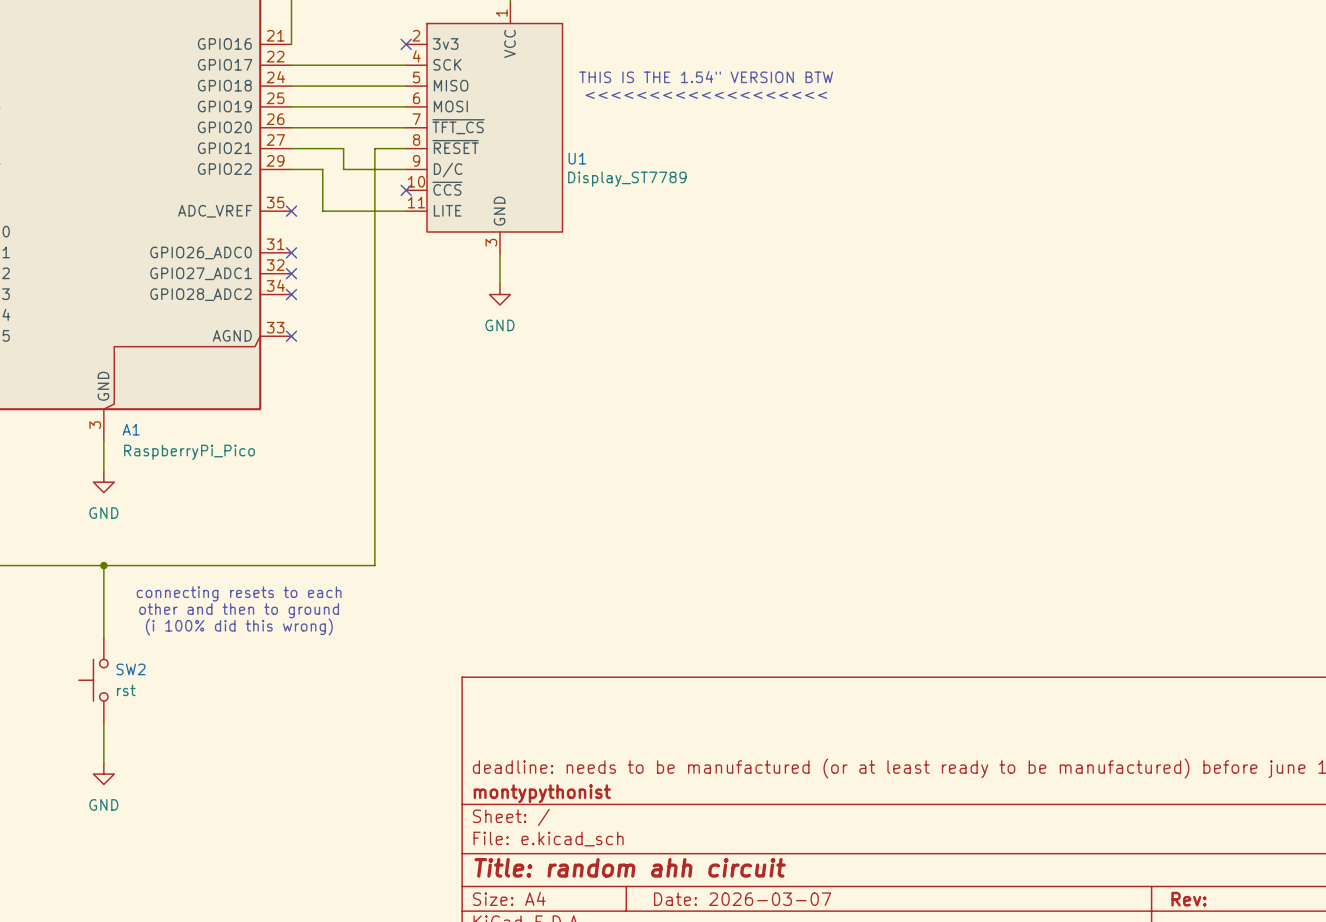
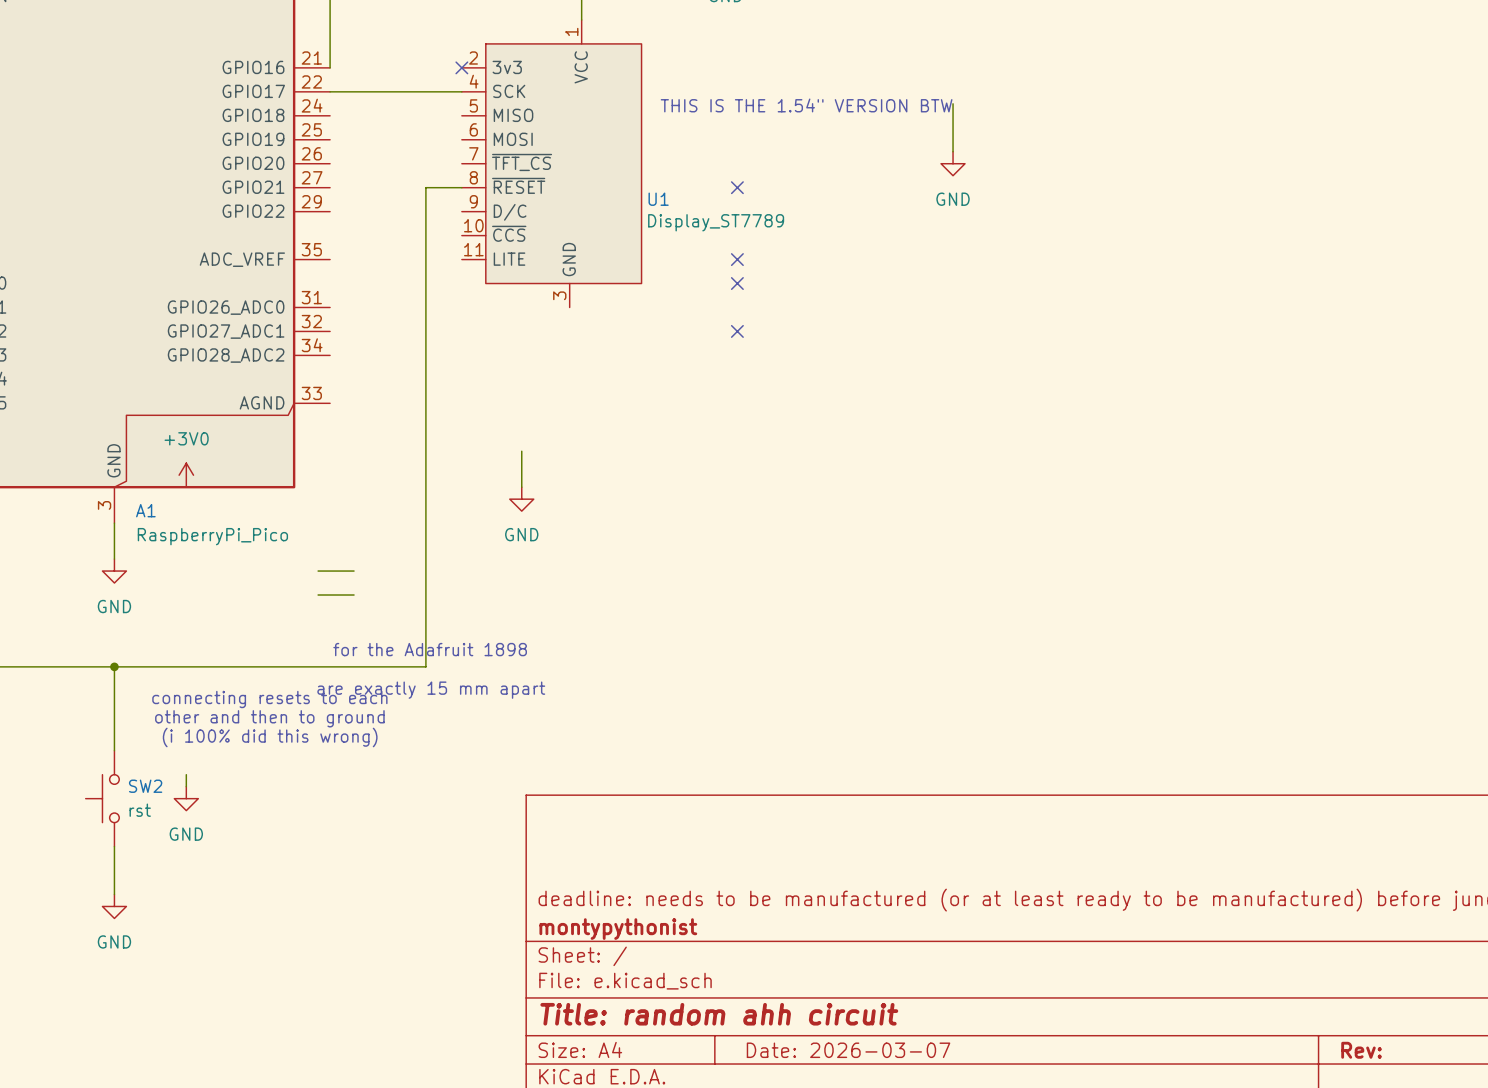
wire: none -> (953, 103) (953, 151)
wire: (291, 86) (406, 86) -> none
text: <<<<<<<<<<<<<<<<<<< (706, 95) -> none
wire: (291, 106) (406, 106) -> none
wire: (291, 127) (406, 127) -> none
power symbol: none -> GND (953, 163)
wire: (291, 148) (343, 148) (343, 169) (406, 169) -> none
no-connect mark: none -> (737, 187)
wire: (291, 169) (322, 169) (322, 211) (406, 211) -> none
no-connect mark: (406, 190) -> none
no-connect mark: (291, 211) -> none
no-connect mark: none -> (737, 259)
no-connect mark: none -> (737, 283)
no-connect mark: (291, 252) -> none
wire: (499, 252) (499, 284) -> (521, 451) (521, 487)
no-connect mark: (291, 273) -> none
no-connect mark: none -> (737, 331)
no-connect mark: (291, 294) -> none
power symbol position: GND (499, 294) -> GND (521, 499)
no-connect mark: (291, 336) -> none
power symbol: none -> +3V0 (186, 475)
wire: none -> (318, 571) (354, 571)
wire: none -> (318, 595) (354, 595)
text: none -> for the Adafruit 1898 (430, 649)
text: none -> are exactly 15 mm apart (431, 690)
wire: none -> (186, 774) (186, 786)
power symbol: none -> GND (186, 798)

